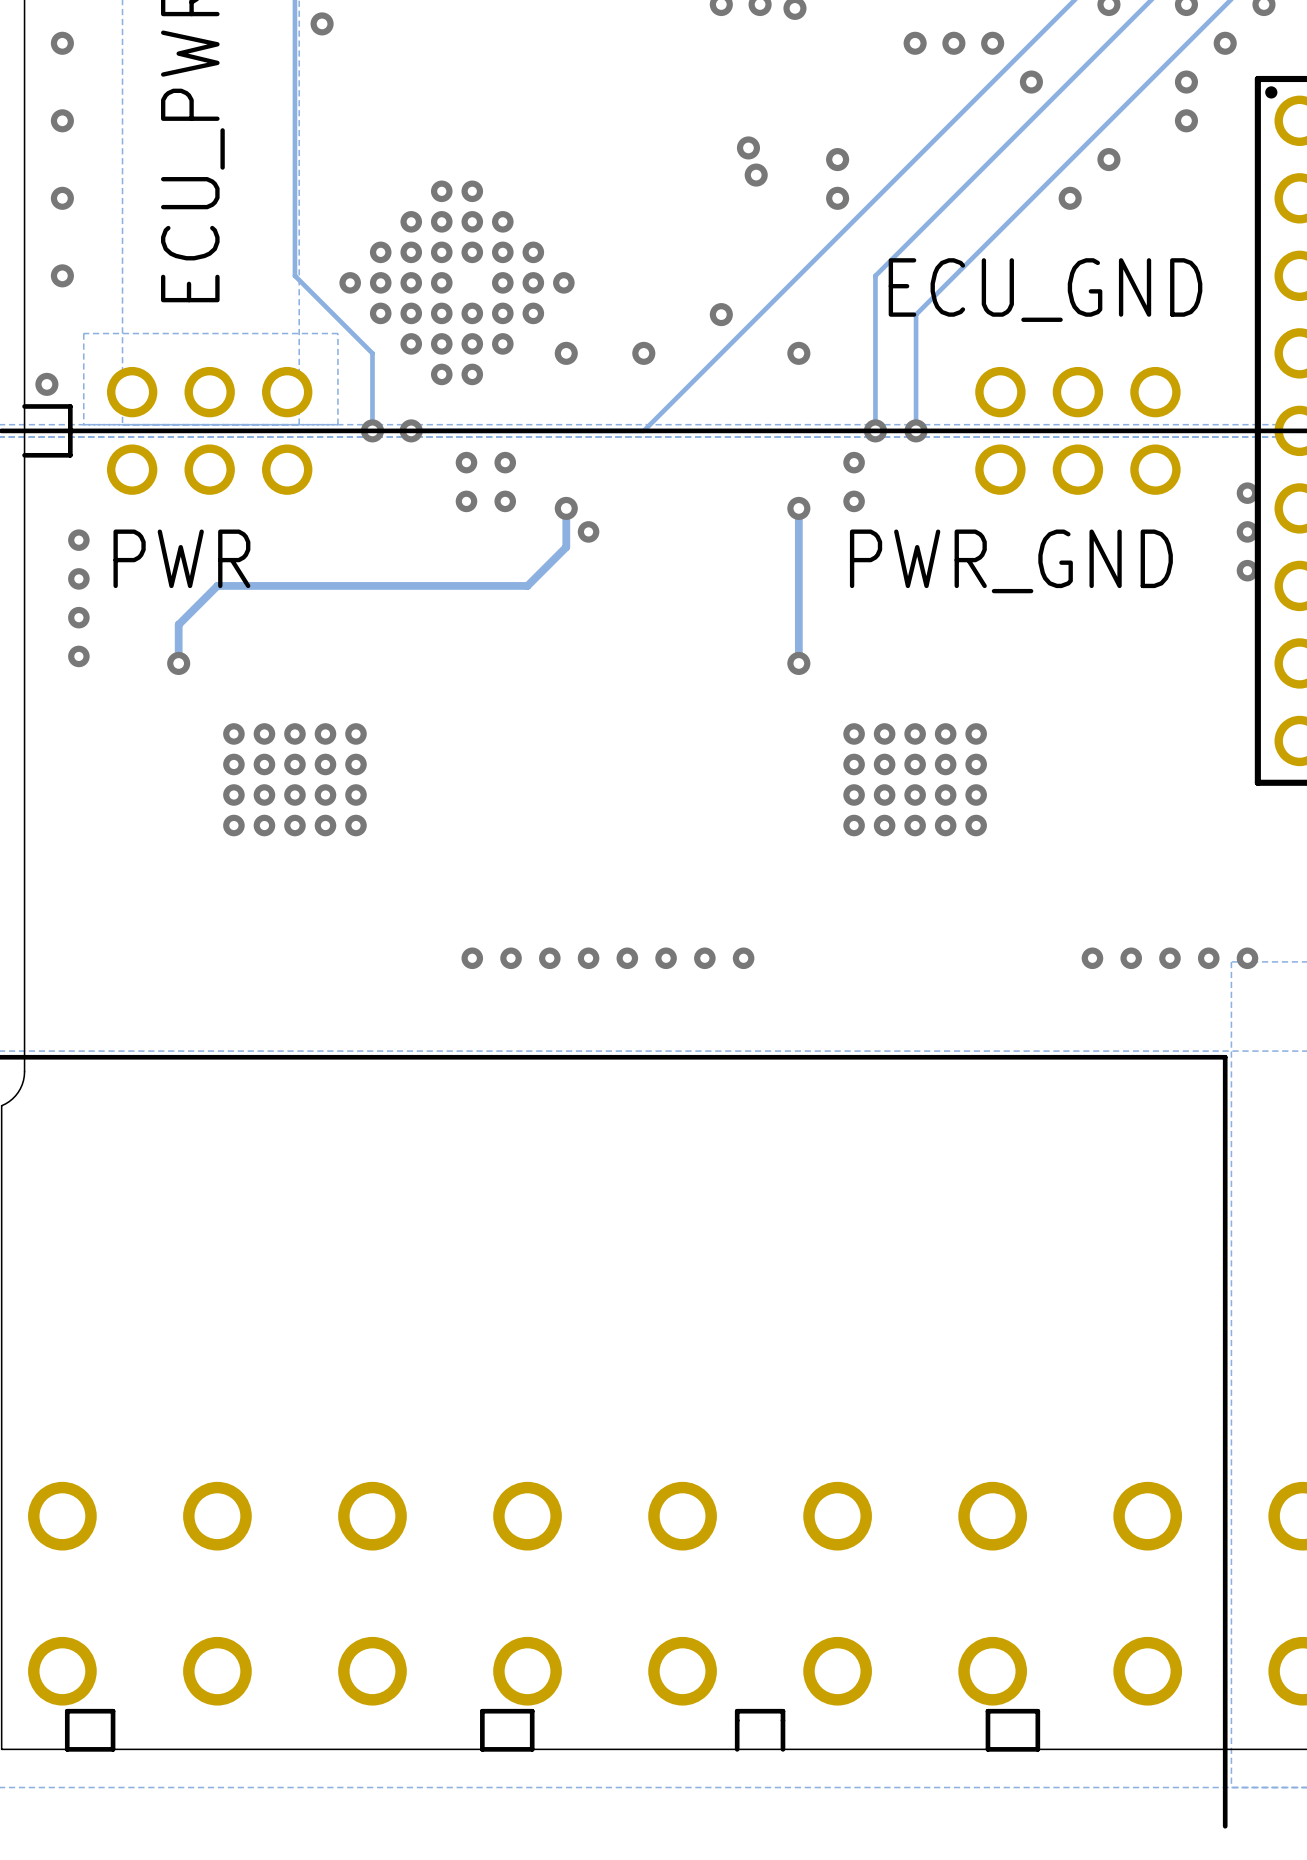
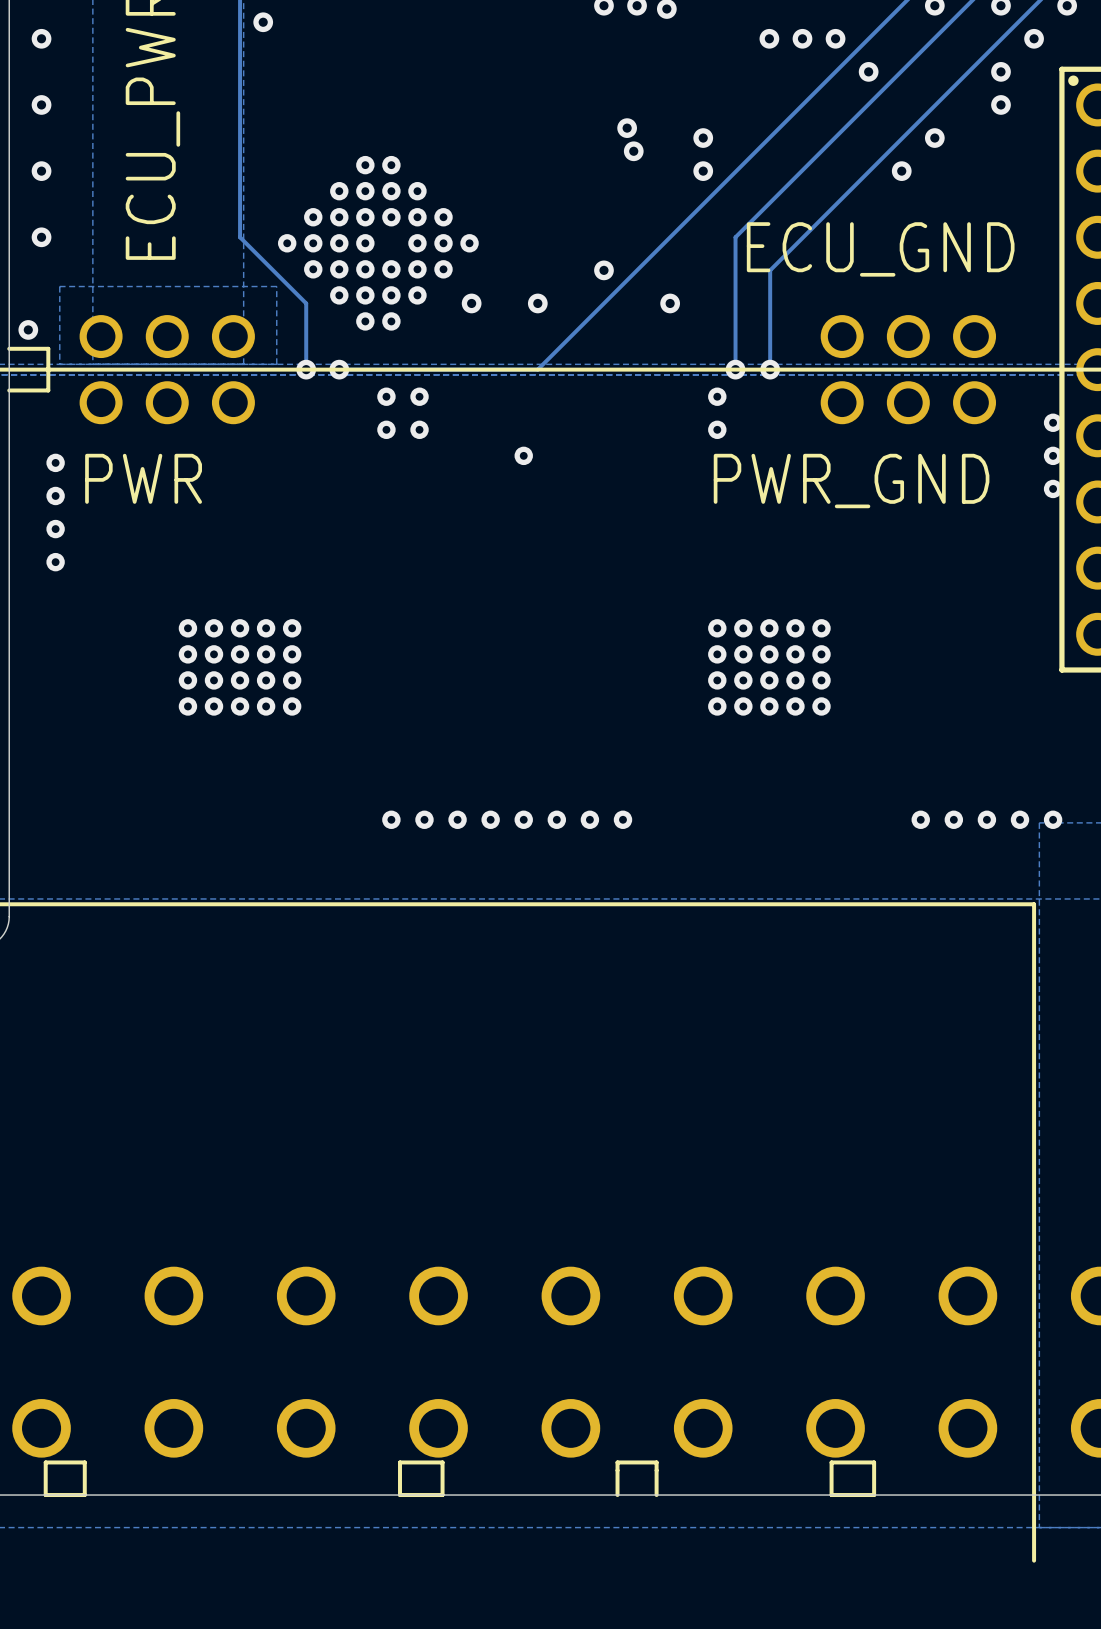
track: (566, 508) (566, 547) (527, 585) (217, 585) (178, 624) (178, 663) -> none
via: (566, 508) -> none
track: (798, 508) (798, 663) -> none
via: (798, 508) -> none
via position: (588, 531) -> (523, 455)
via: (178, 663) -> none
via: (798, 663) -> none

